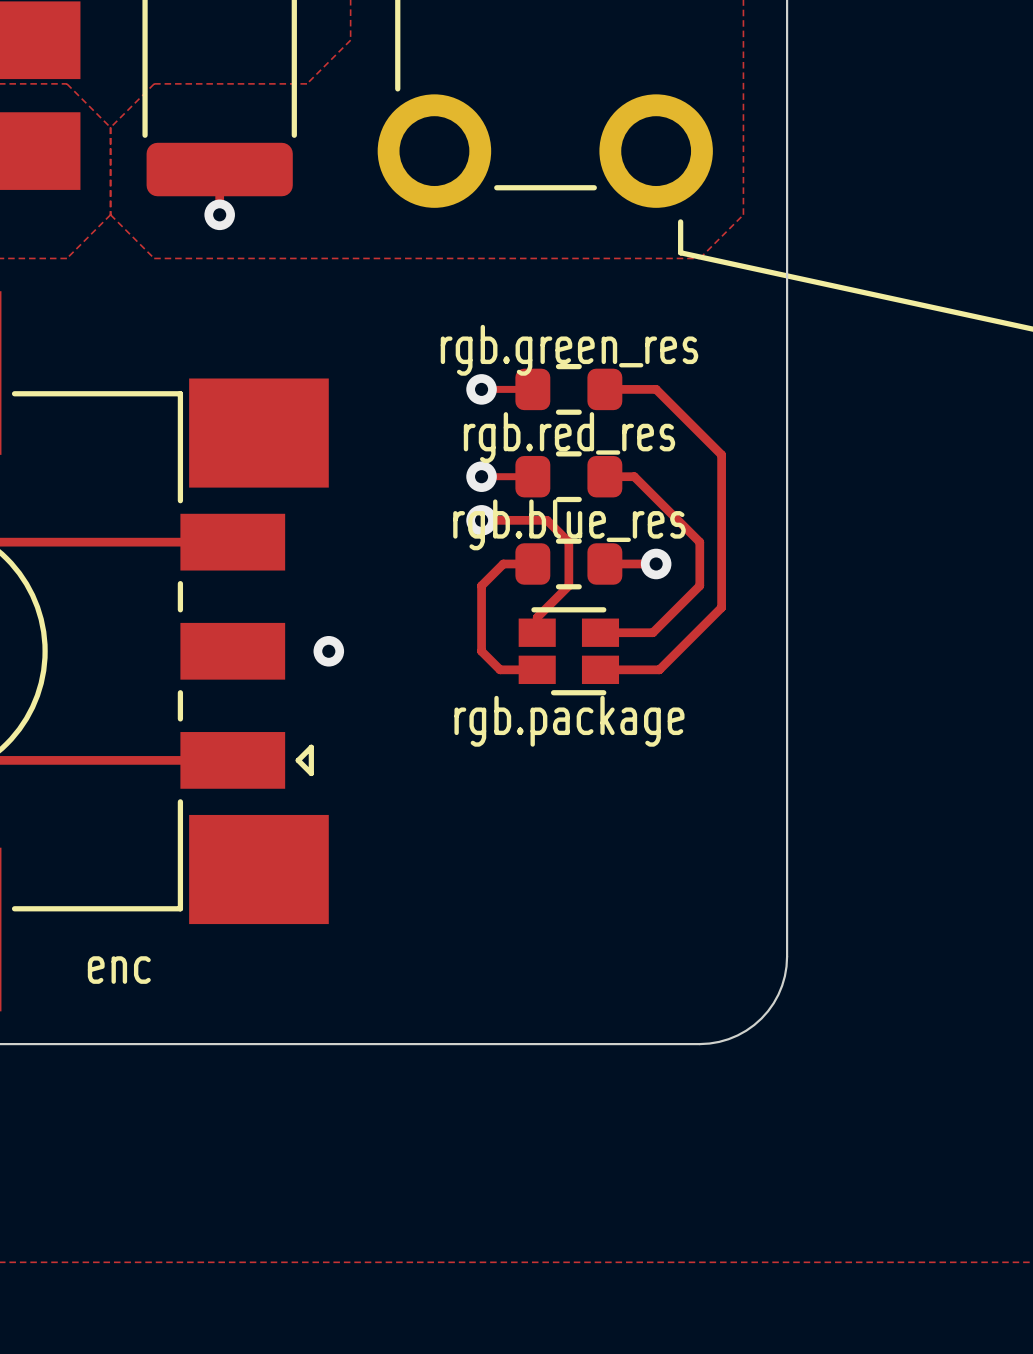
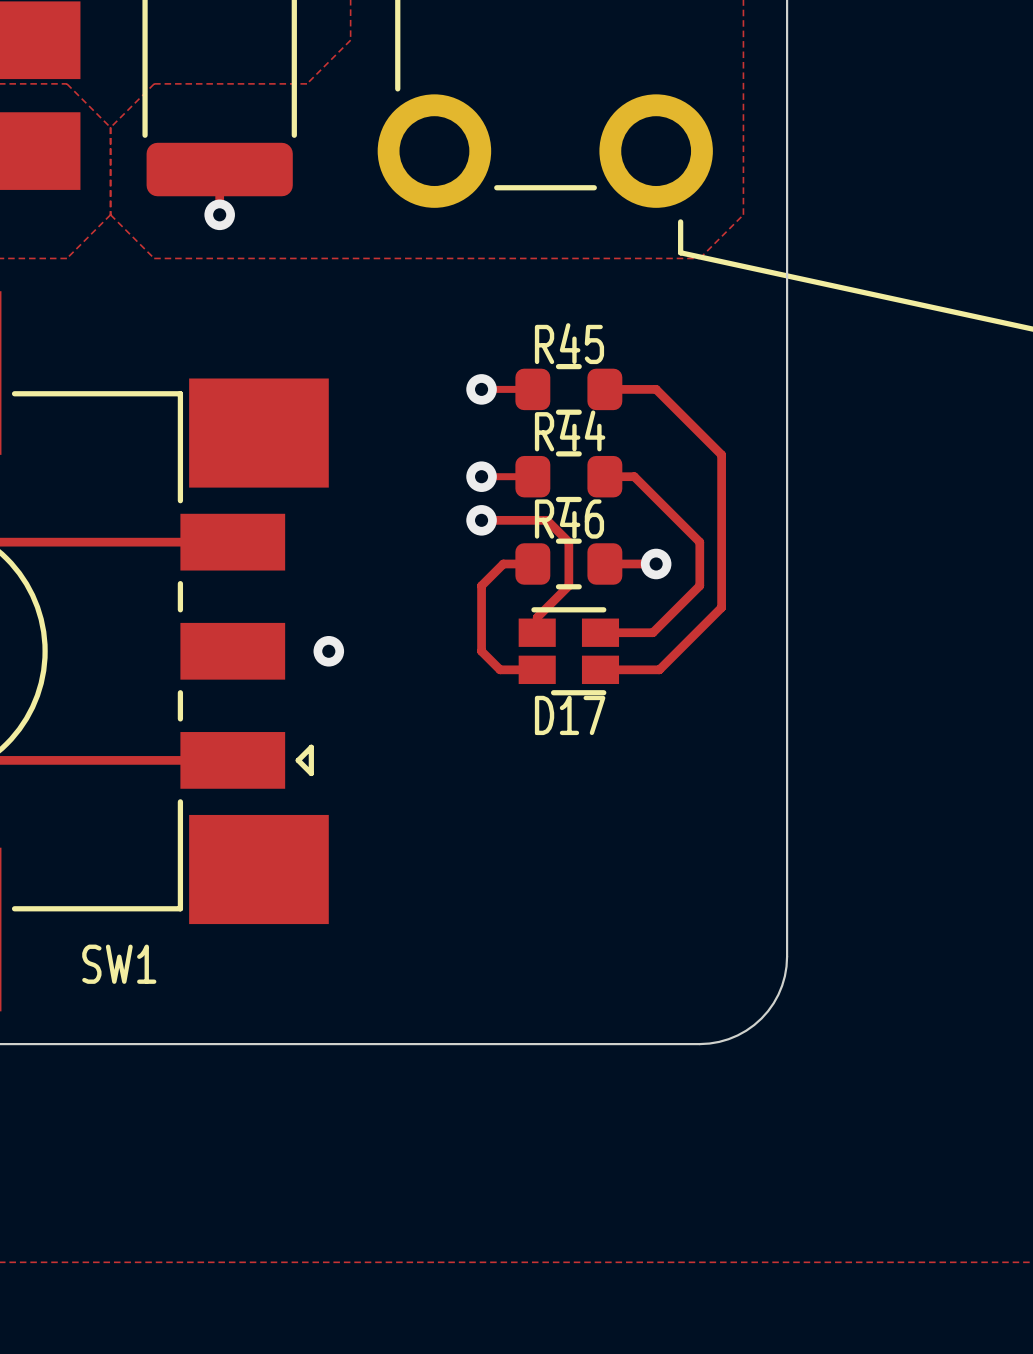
rgb.green_res name: rgb.green_res (569, 350) -> R45 (569, 343)
rgb.red_res name: rgb.red_res (569, 437) -> R44 (570, 430)
rgb.blue_res name: rgb.blue_res (569, 524) -> R46 (569, 518)
rgb.package name: rgb.package (569, 721) -> D17 (570, 715)
enc name: enc (119, 970) -> SW1 (119, 964)

